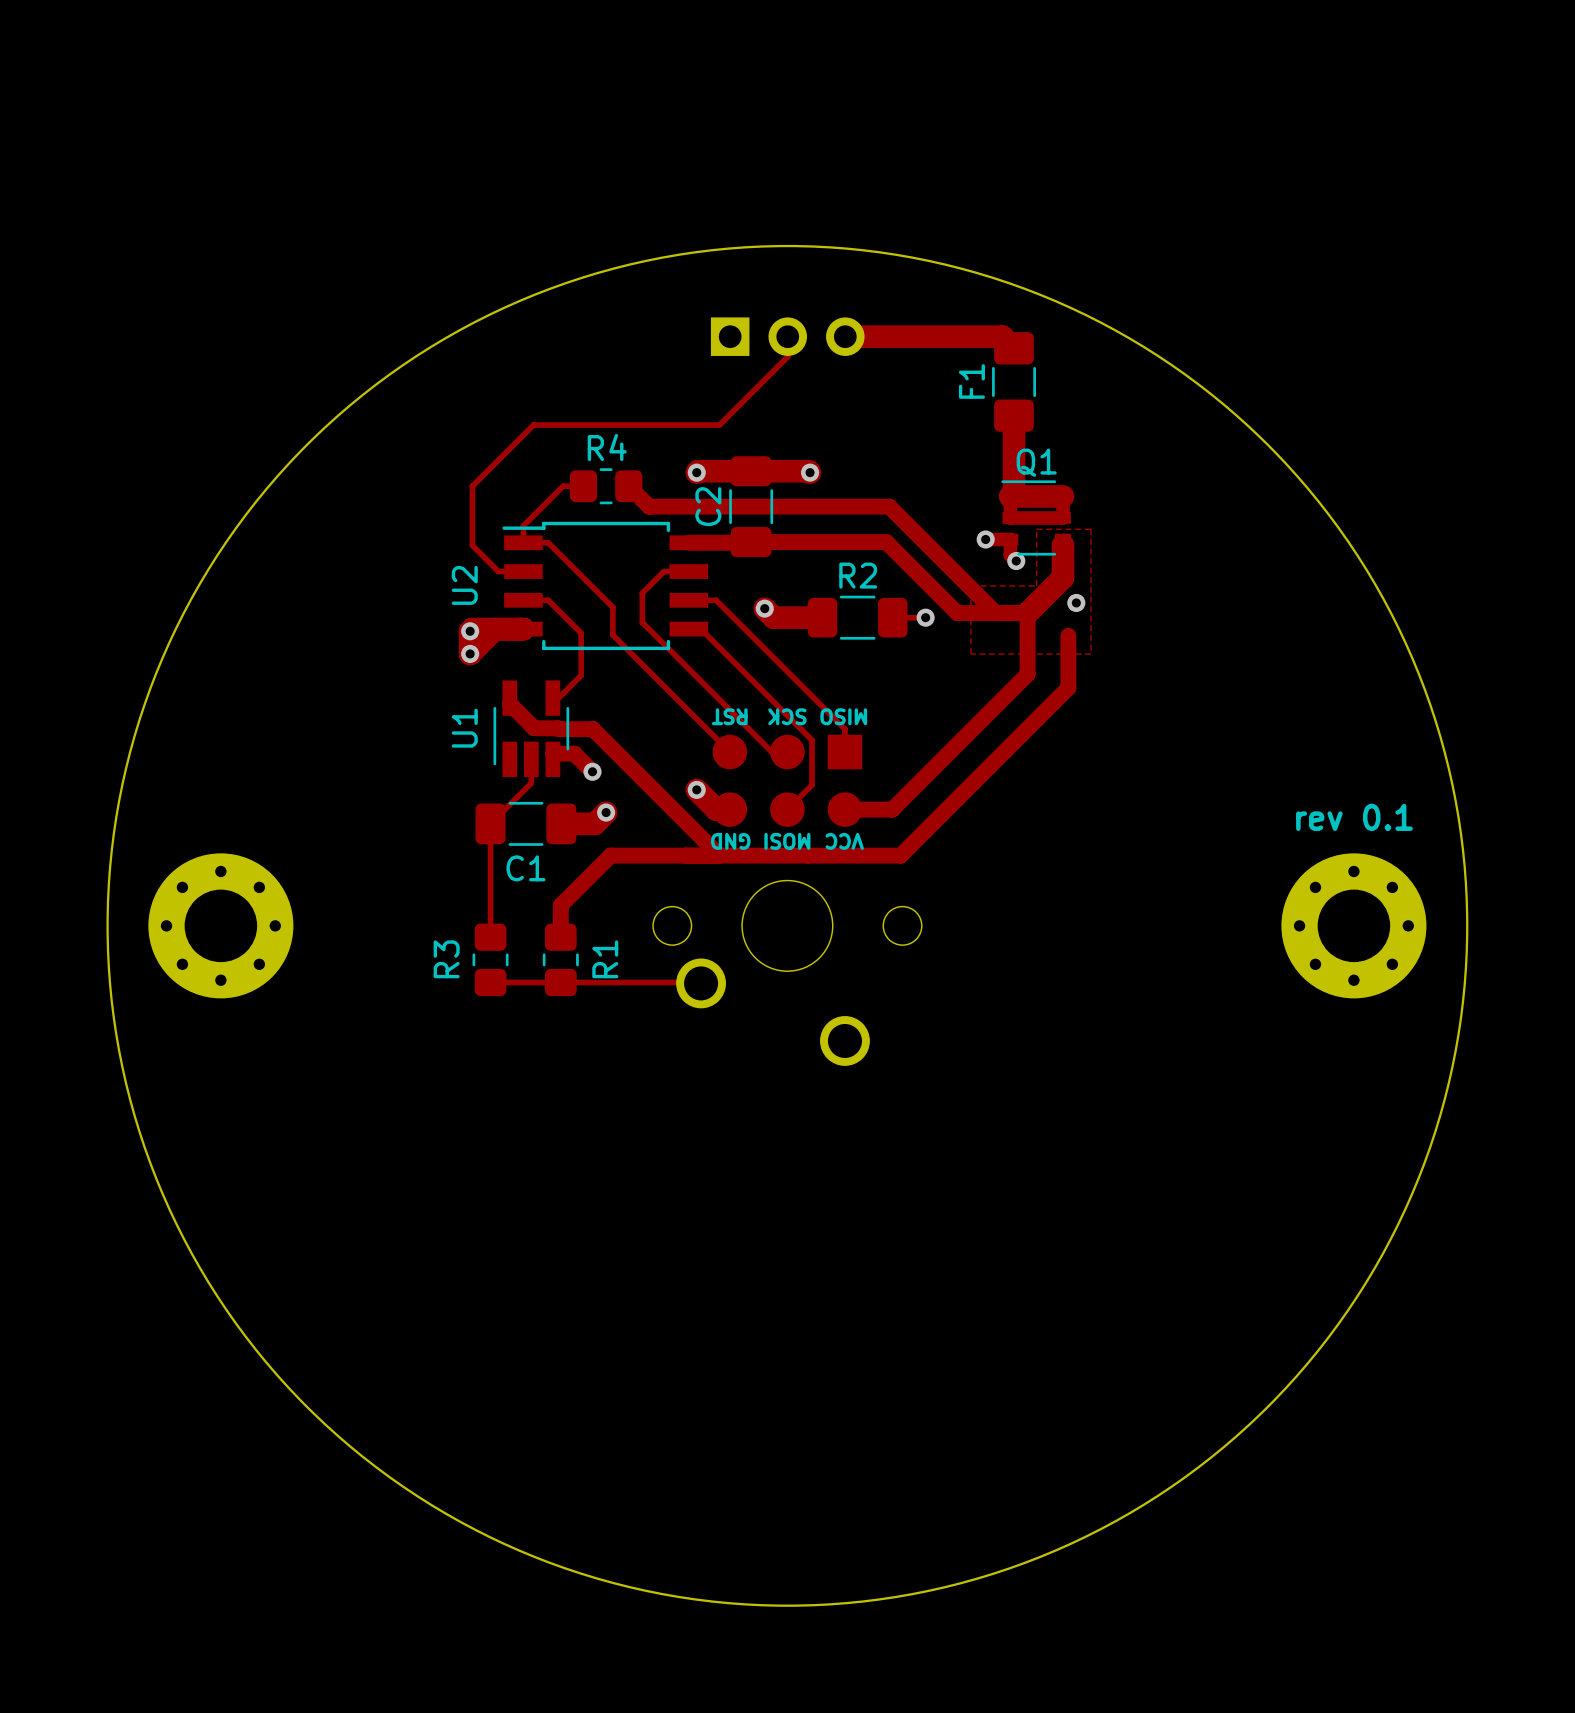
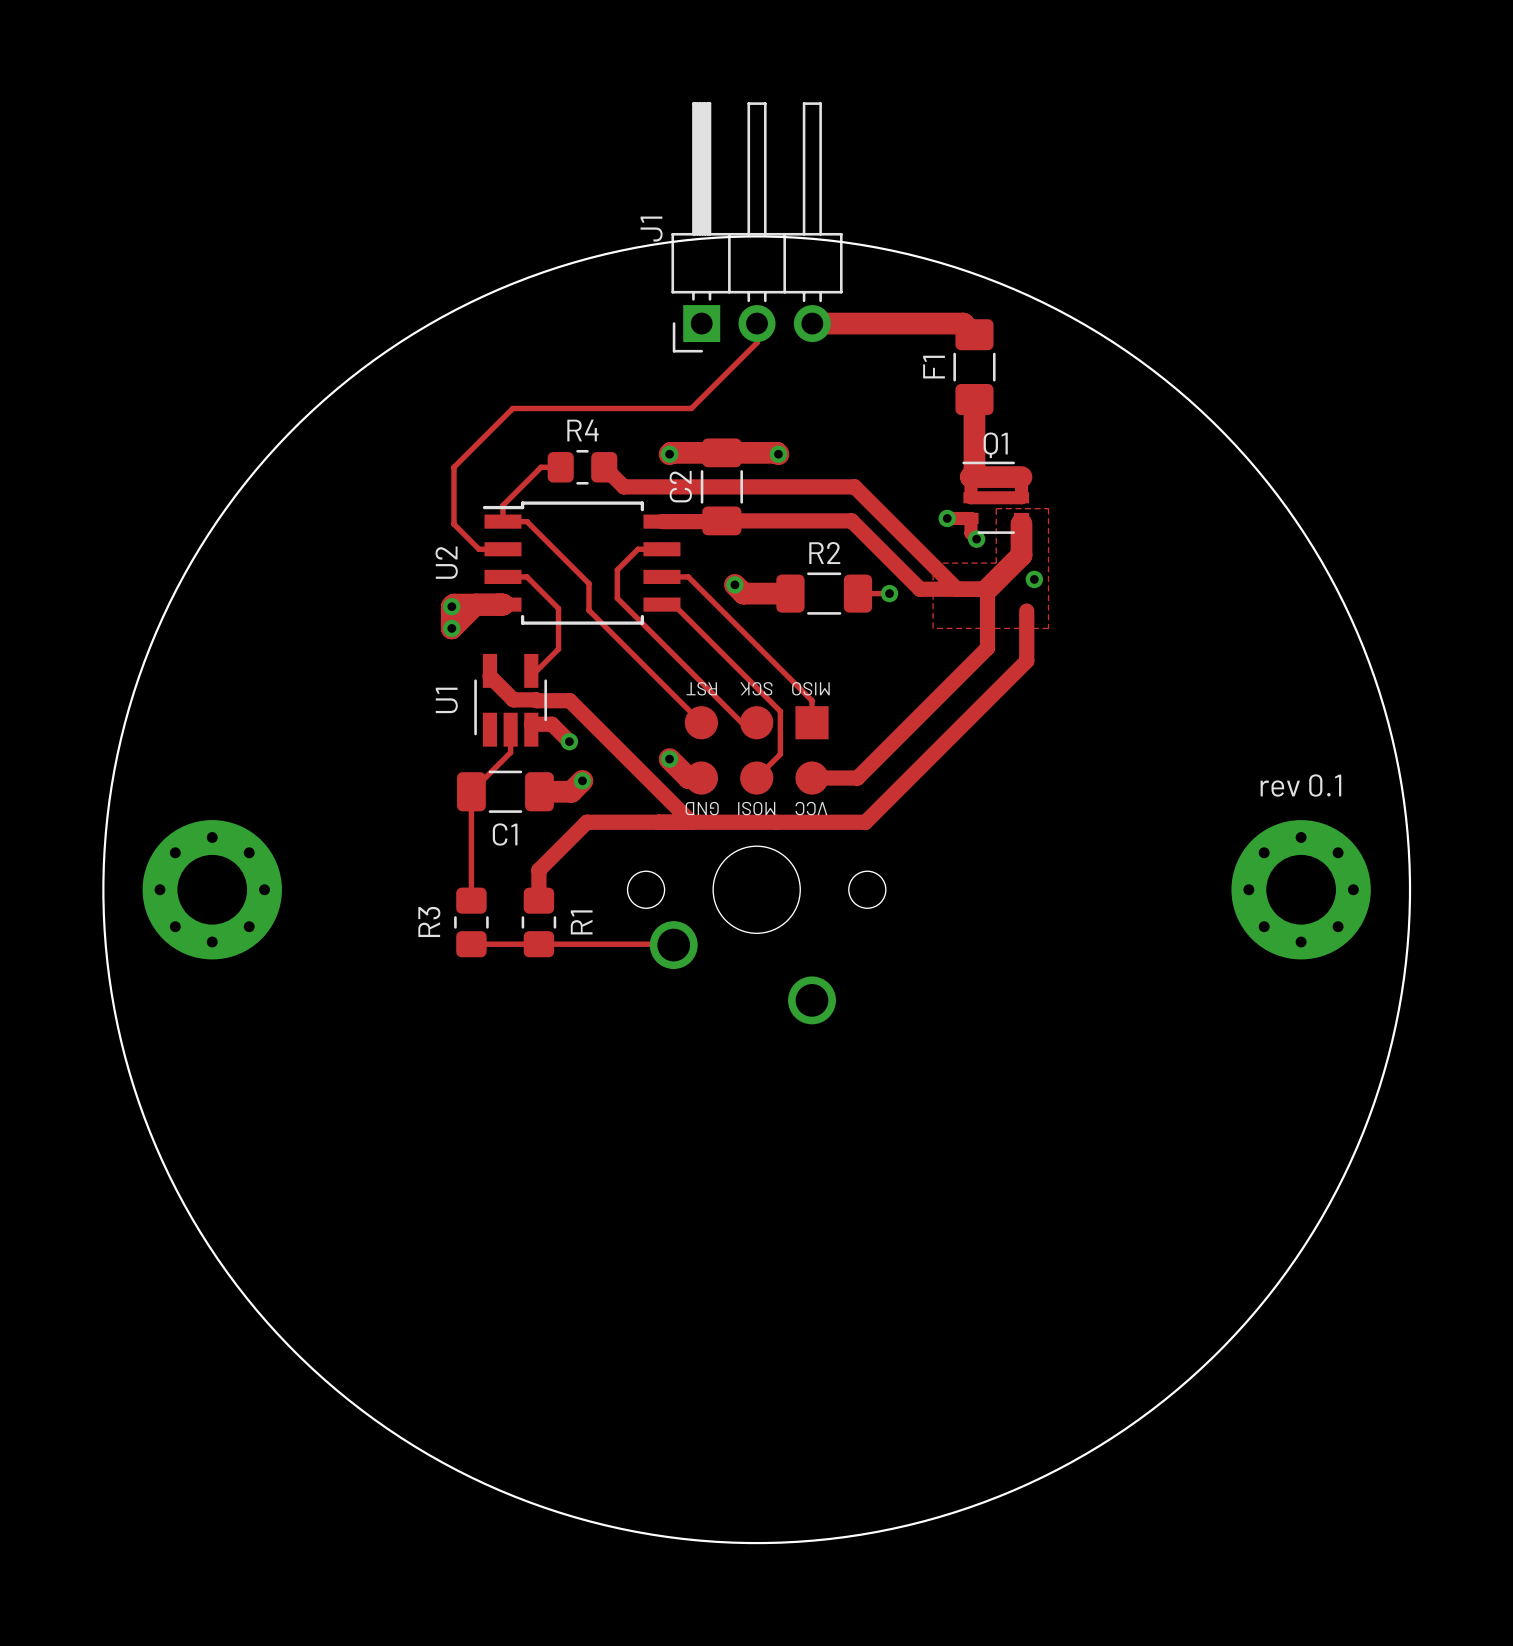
J1: none -> (757, 227)

